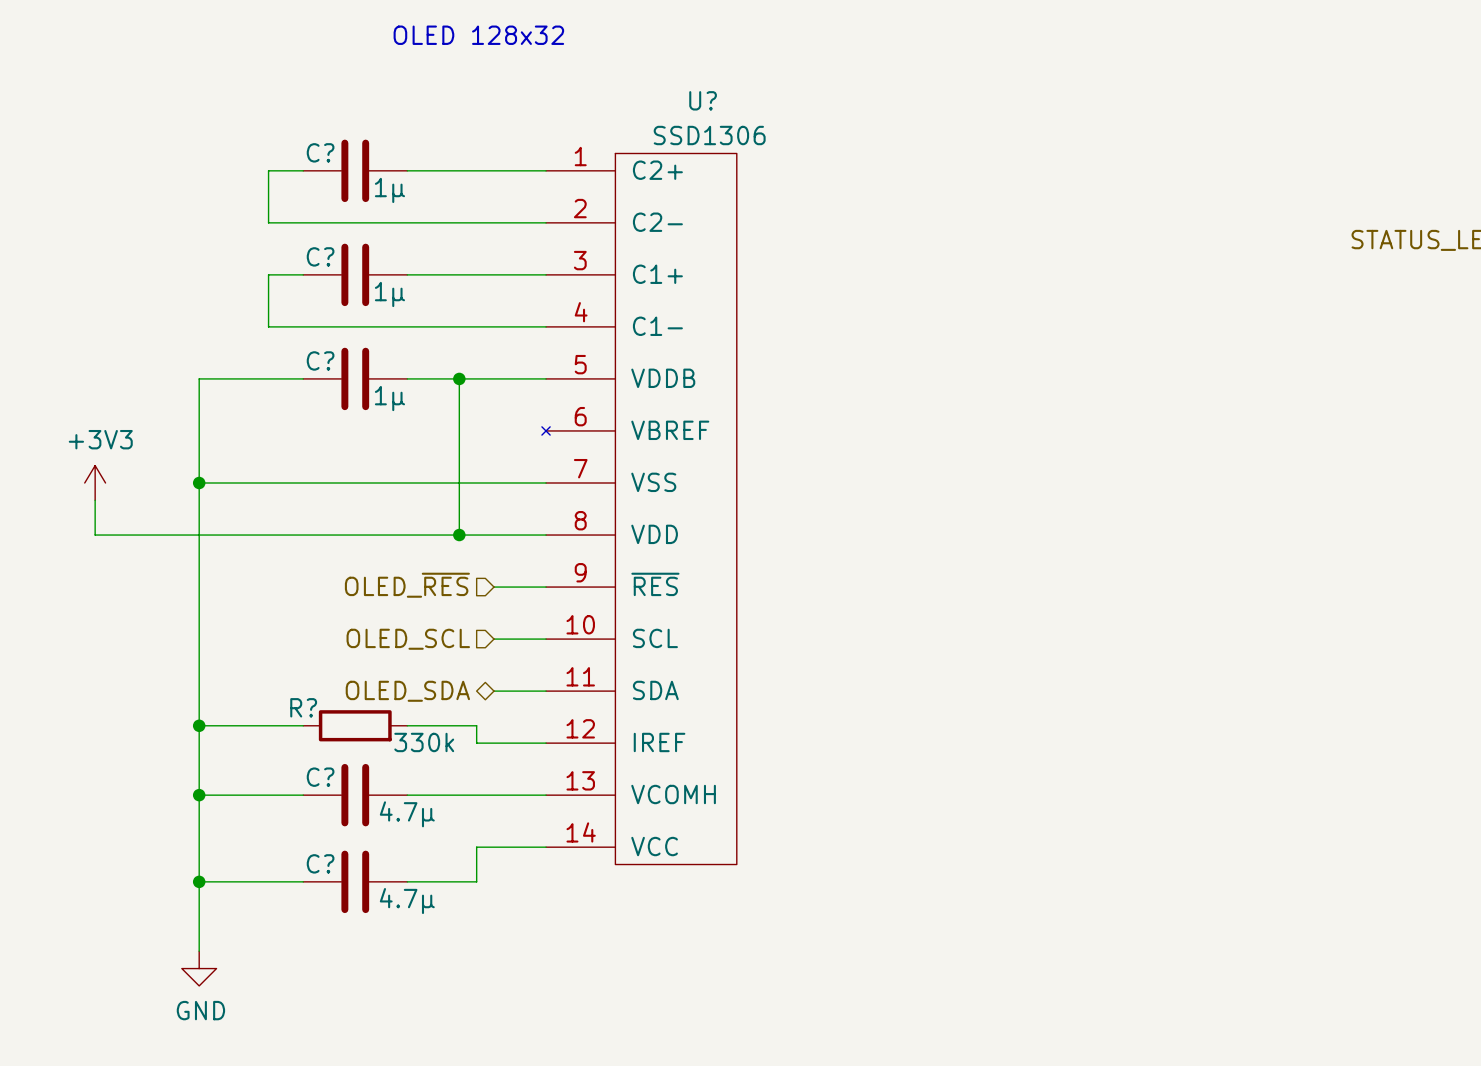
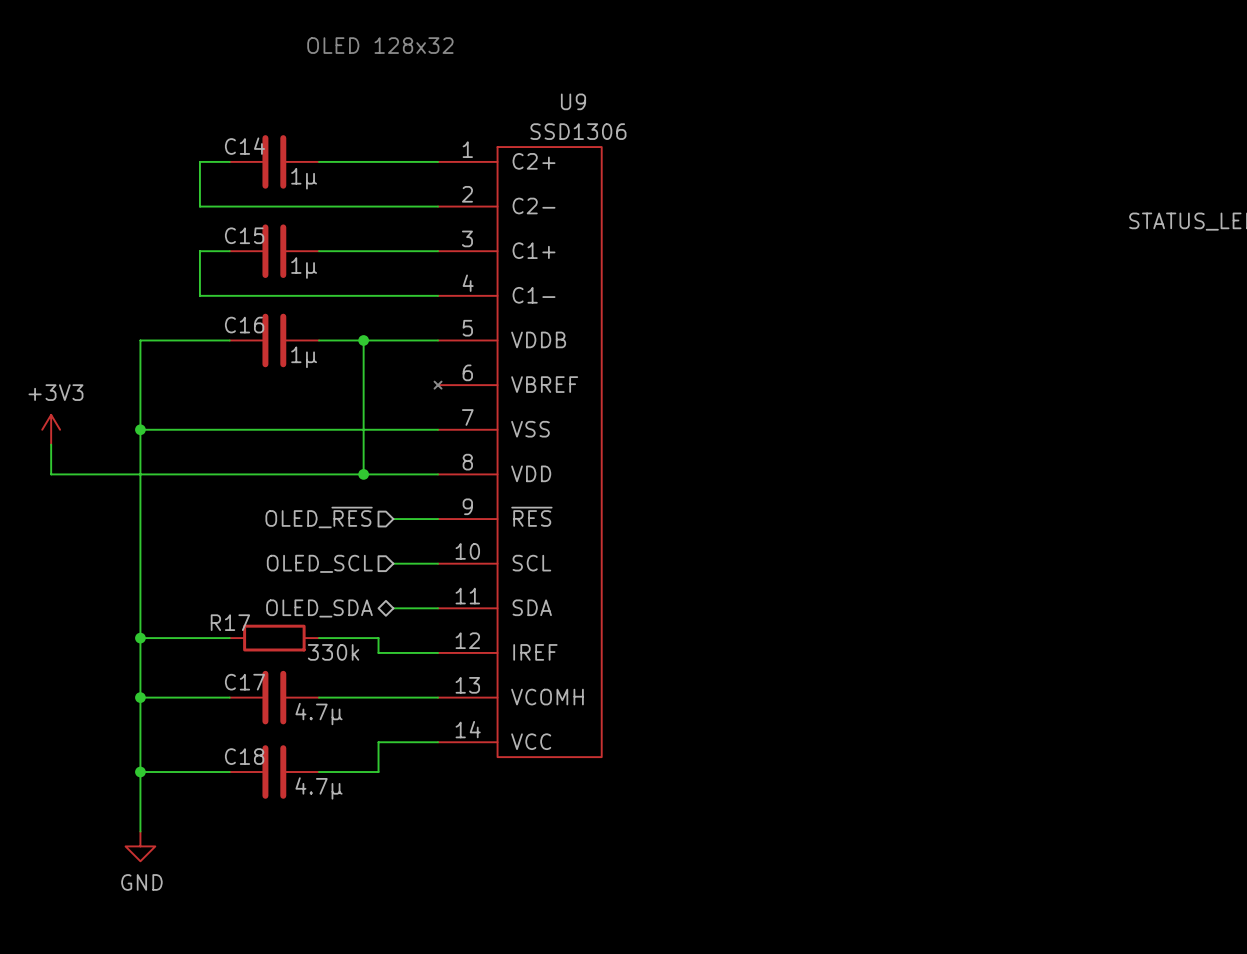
U? name: U? (703, 100) -> U9 (573, 101)
C? name: C? (320, 152) -> C14 (244, 146)
C? name: C? (320, 256) -> C15 (244, 235)
C? name: C? (320, 360) -> C16 (244, 325)
R? name: R? (303, 707) -> R17 (230, 622)
C? name: C? (320, 777) -> C17 (244, 682)
C? name: C? (320, 863) -> C18 (244, 756)

